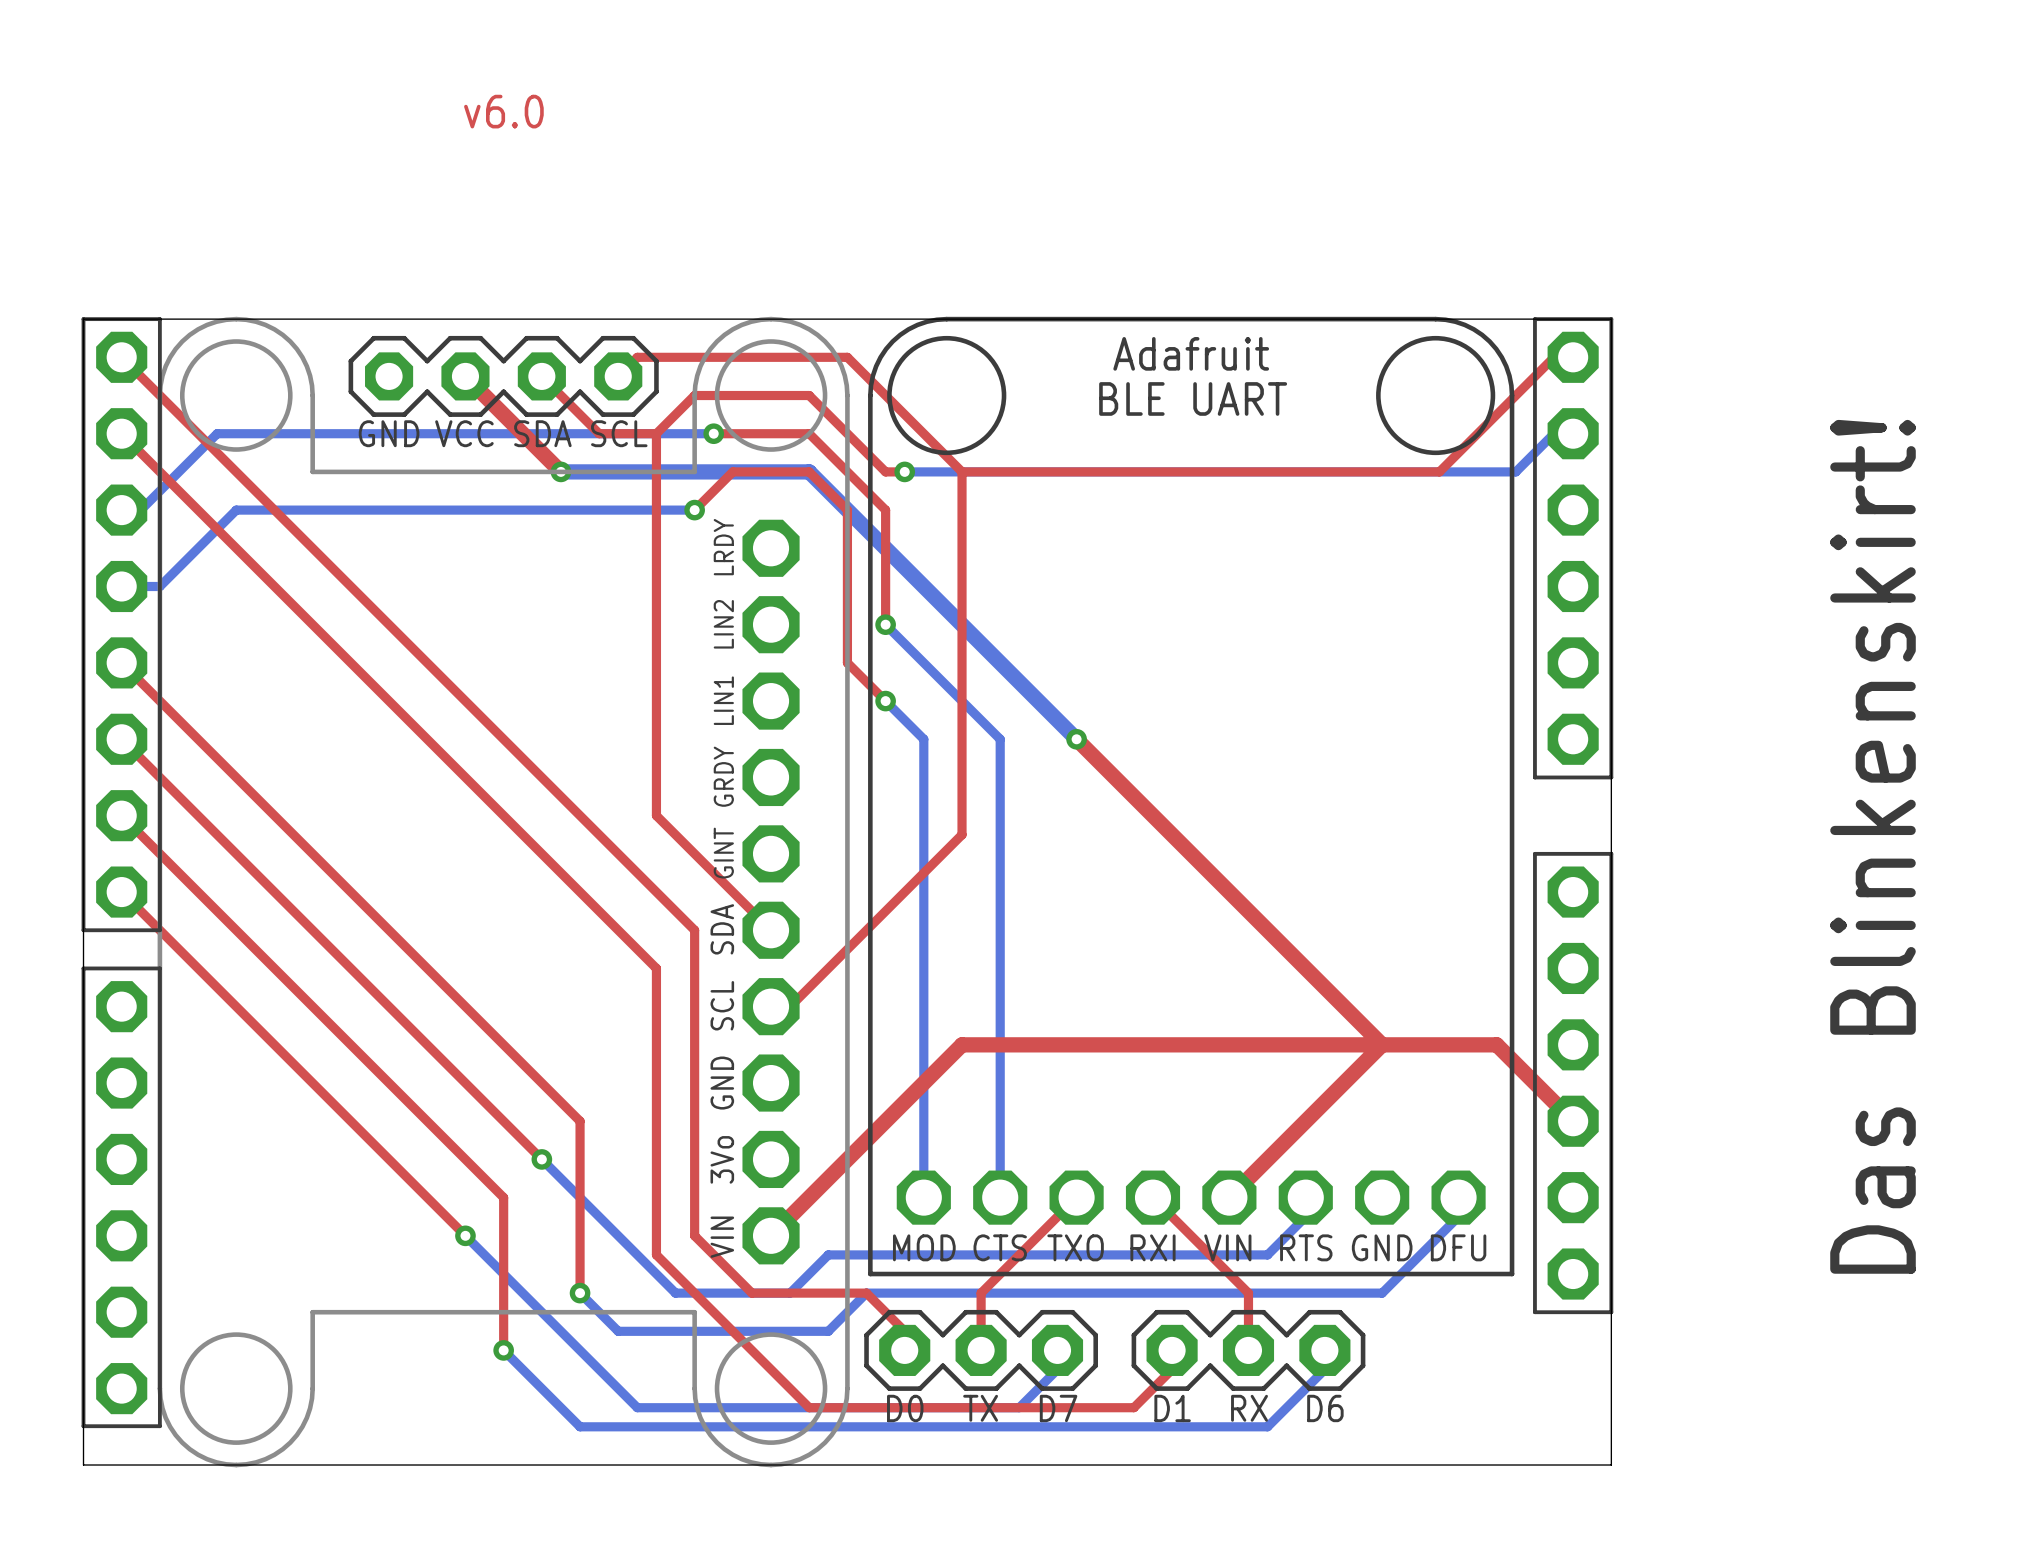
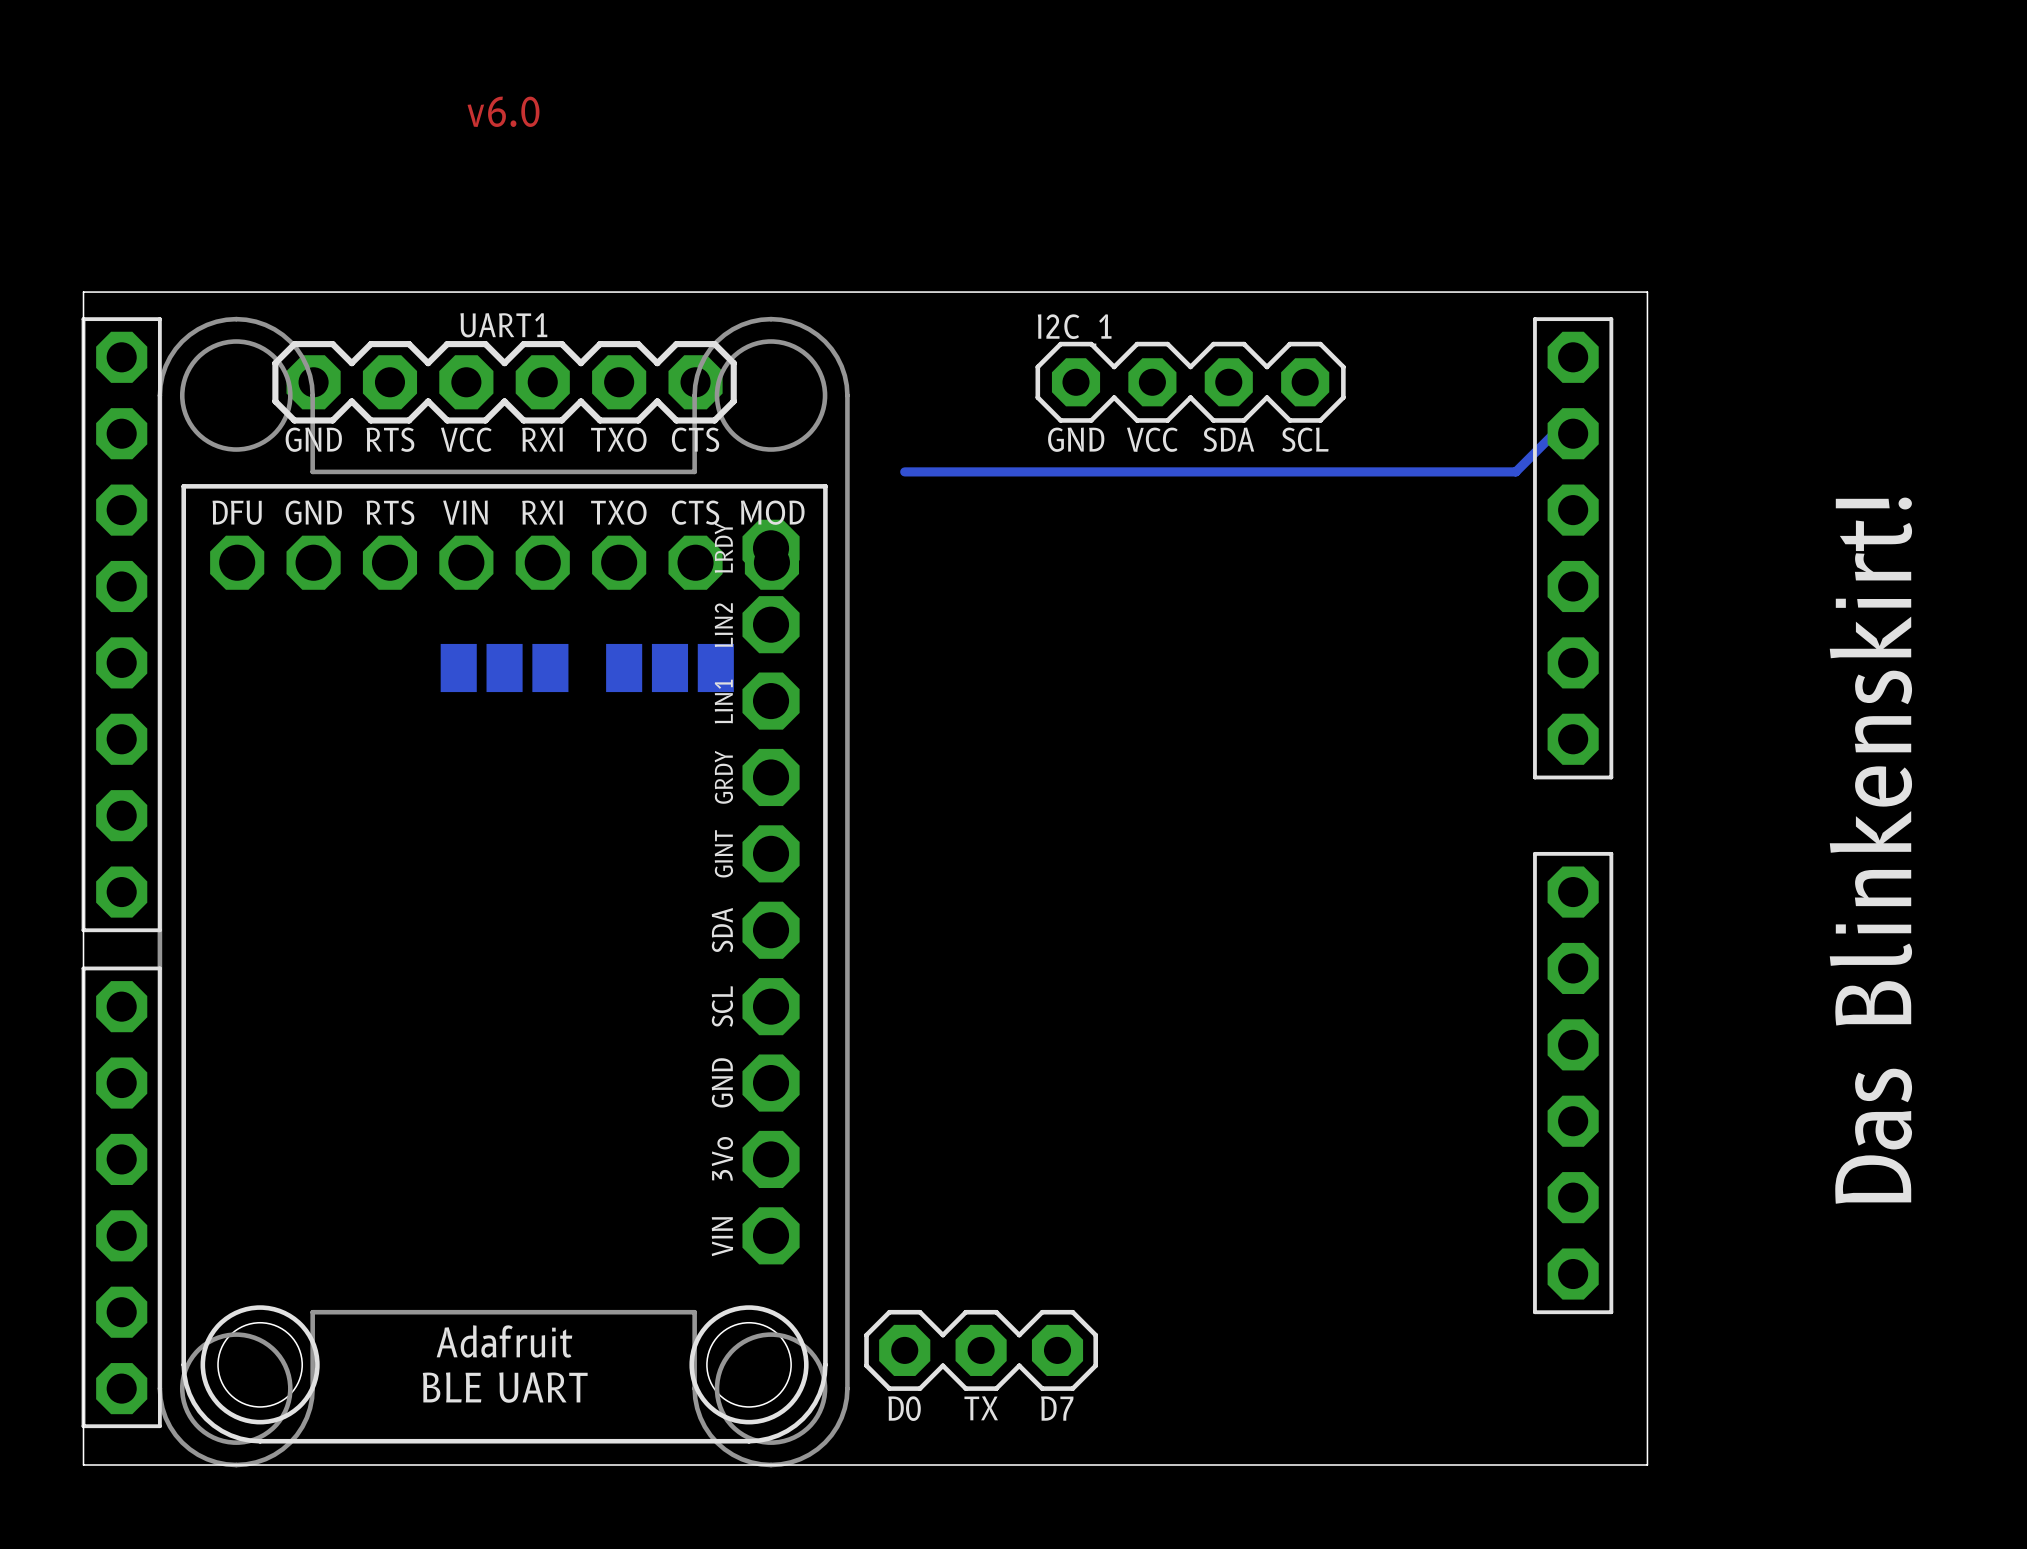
board edge: (83, 319) (1611, 319) (1611, 1465) -> (83, 319) (83, 292) (1647, 292) (1647, 1465) (1611, 1465)
top track: (121, 357) (694, 930) (694, 1235) (751, 1293) (866, 1293) (904, 1331) (904, 1350) -> none
top track: (1573, 357) (1554, 357) (1439, 471) (962, 471) -> none
top track: (465, 376) (560, 471) -> none
part: (503, 376) -> none
top track: (541, 376) (599, 433) (656, 433) -> none
top track: (618, 376) (637, 357) (847, 357) (962, 471) -> none
UART1: none -> (504, 382)
I2C_1: none -> (1190, 382)
top track: (121, 433) (656, 968) (656, 1254) (809, 1407) (1133, 1407) (1172, 1369) (1172, 1350) -> none
top track: (656, 433) (694, 395) (809, 395) (885, 471) (904, 471) -> none
top track: (656, 433) (656, 815) (771, 930) -> none
bottom track: (713, 433) (217, 433) (140, 510) (121, 510) -> none
top track: (713, 433) (809, 433) (885, 510) (885, 624) -> none
via: (713, 433) -> none
bottom track: (560, 471) (809, 471) (1076, 739) -> none
via: (560, 471) -> none
via: (904, 471) -> none
top track: (962, 471) (962, 834) (790, 1006) (771, 1006) -> none
bottom track: (694, 510) (236, 510) (159, 586) (121, 586) -> none
top track: (694, 510) (732, 471) (809, 471) (847, 510) (847, 662) (885, 701) -> none
via: (694, 510) -> none
bottom track: (885, 624) (1000, 739) (1000, 1197) -> none
via: (885, 624) -> none
top track: (121, 662) (580, 1121) (580, 1293) -> none
part: none -> (504, 668)
part: none -> (669, 668)
bottom track: (885, 701) (923, 739) (923, 1197) -> none
via: (885, 701) -> none
top track: (121, 739) (541, 1159) -> none
top track: (1076, 739) (1382, 1044) (1229, 1197) -> none
via: (1076, 739) -> none
part: (1191, 796) -> none
top track: (121, 815) (503, 1197) (503, 1350) -> none
top track: (121, 892) (465, 1235) -> none
part: none -> (504, 963)
top track: (1573, 1121) (1496, 1044) (962, 1044) (771, 1235) -> none
bottom track: (541, 1159) (675, 1293) (790, 1293) (828, 1254) (1267, 1254) (1305, 1216) (1305, 1197) -> none
via: (541, 1159) -> none
top track: (1076, 1197) (981, 1293) (981, 1350) -> none
top track: (1152, 1197) (1248, 1293) (1248, 1350) -> none
bottom track: (1458, 1197) (1458, 1216) (1382, 1293) (866, 1293) (828, 1331) (618, 1331) (580, 1293) -> none
bottom track: (465, 1235) (637, 1407) (1019, 1407) (1057, 1369) (1057, 1350) -> none
via: (465, 1235) -> none
via: (580, 1293) -> none
bottom track: (503, 1350) (580, 1426) (1267, 1426) (1324, 1369) (1324, 1350) -> none
via: (503, 1350) -> none
RX: (1248, 1350) -> none
text: D1 (1172, 1408) -> none
text: D6 (1325, 1408) -> none

